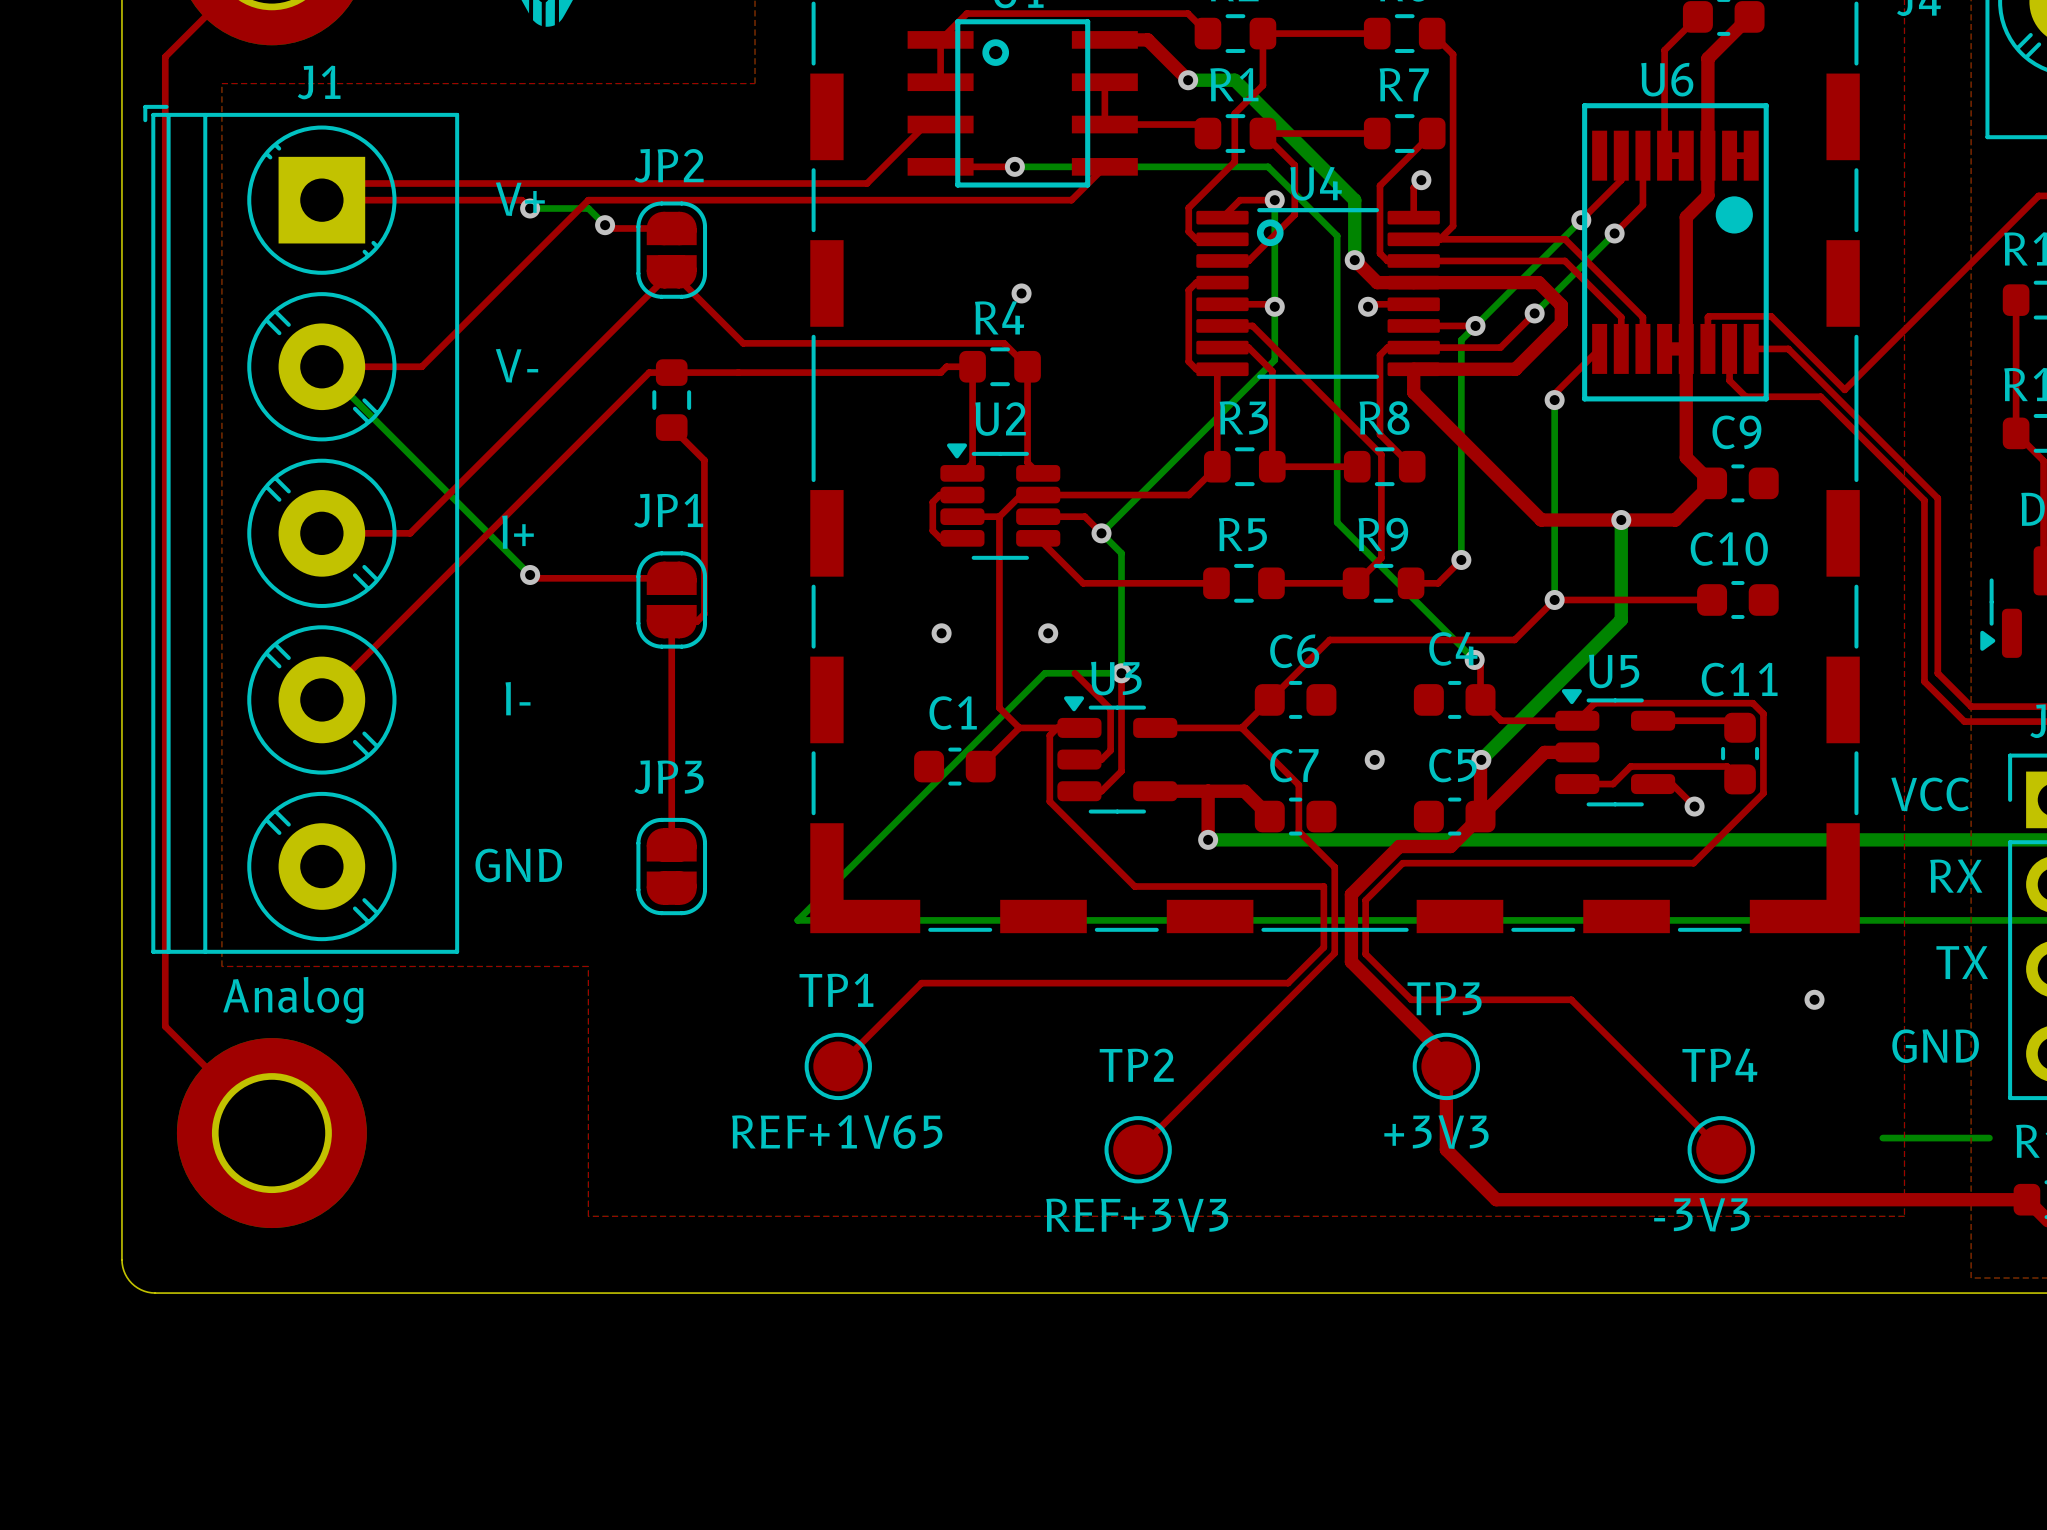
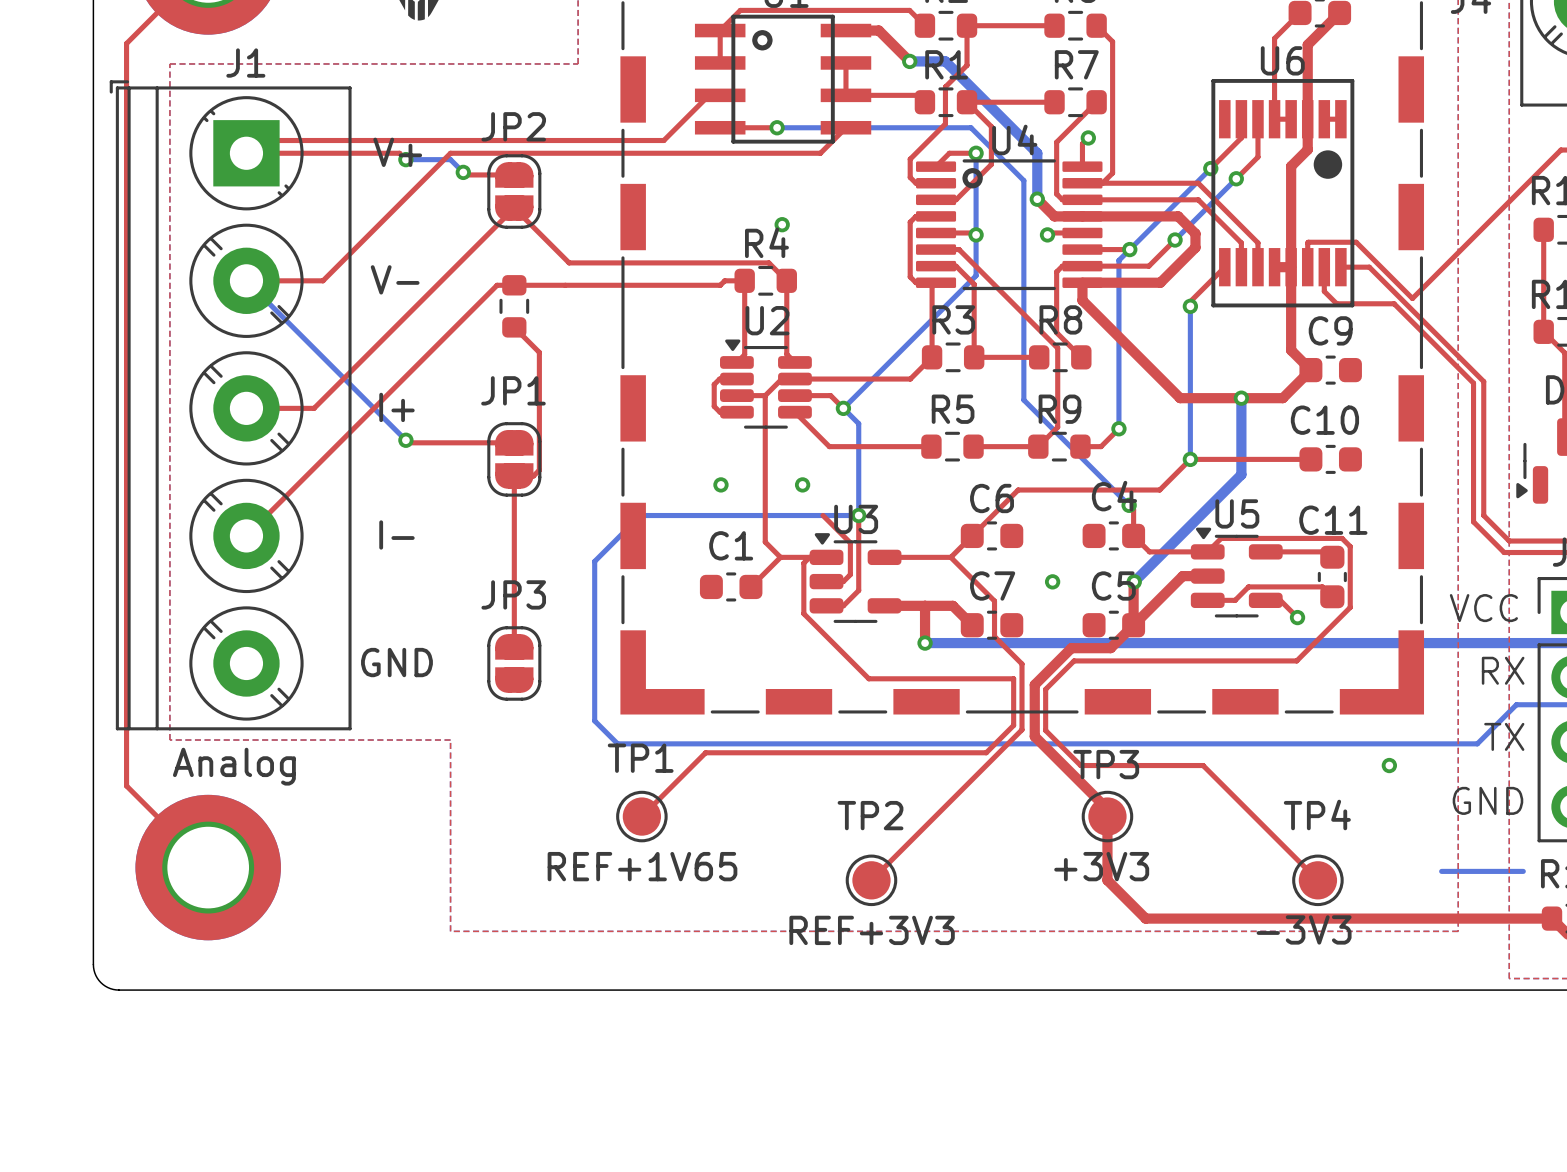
bottom track: (1044, 673) (797, 920) (1980, 920) -> (800, 515) (640, 515) (594, 561) (594, 720) (617, 743) (1477, 743) (1516, 704)

